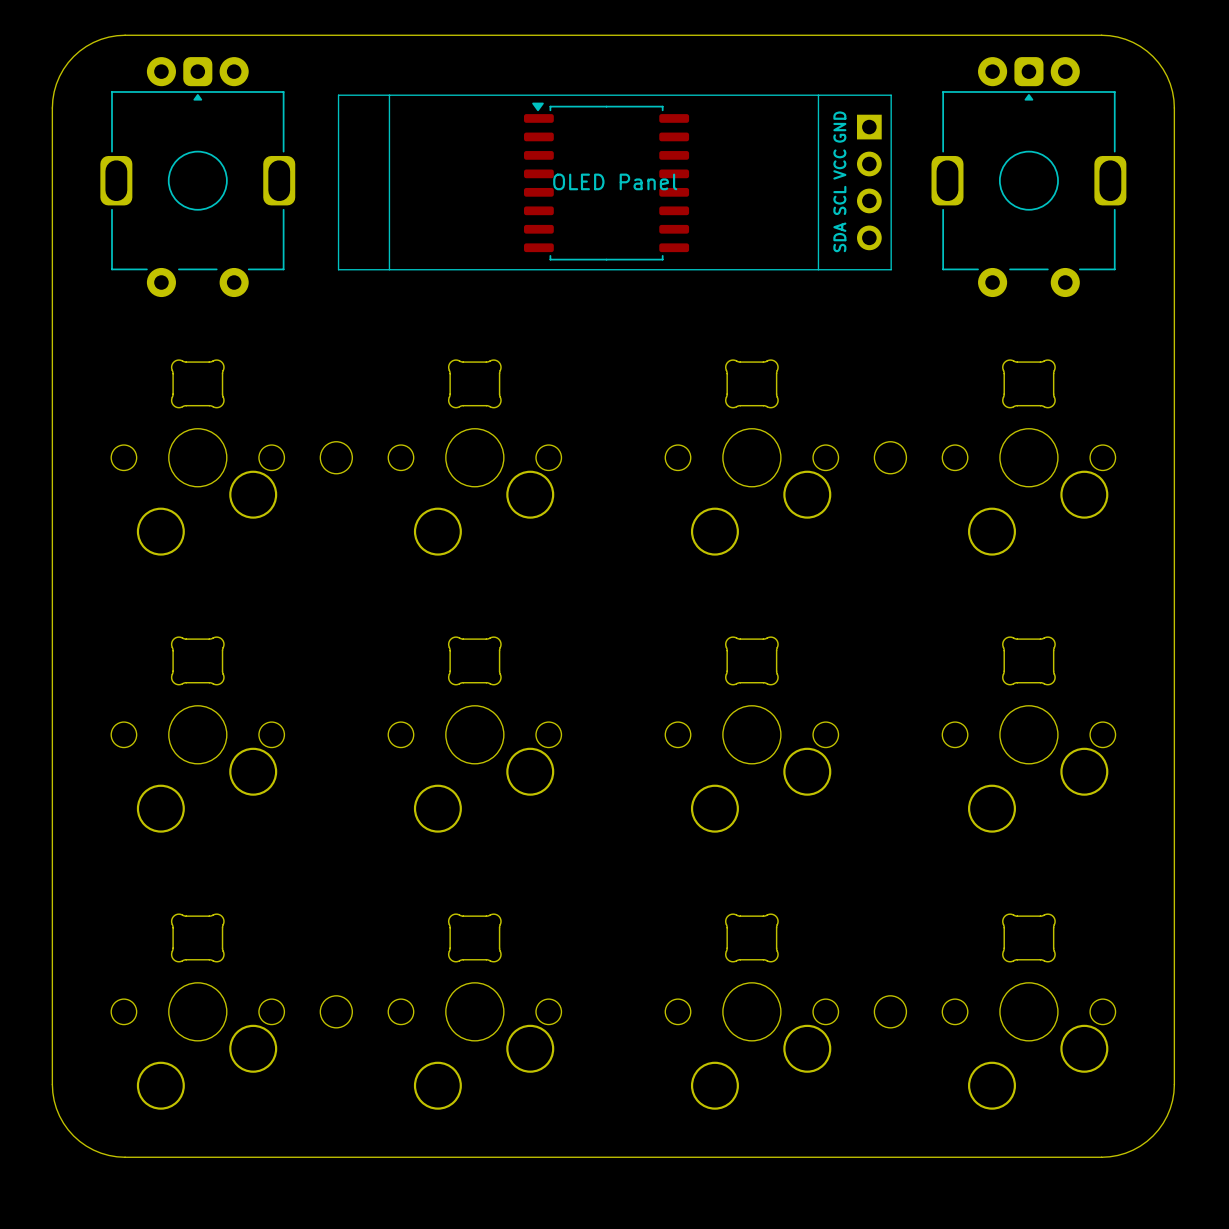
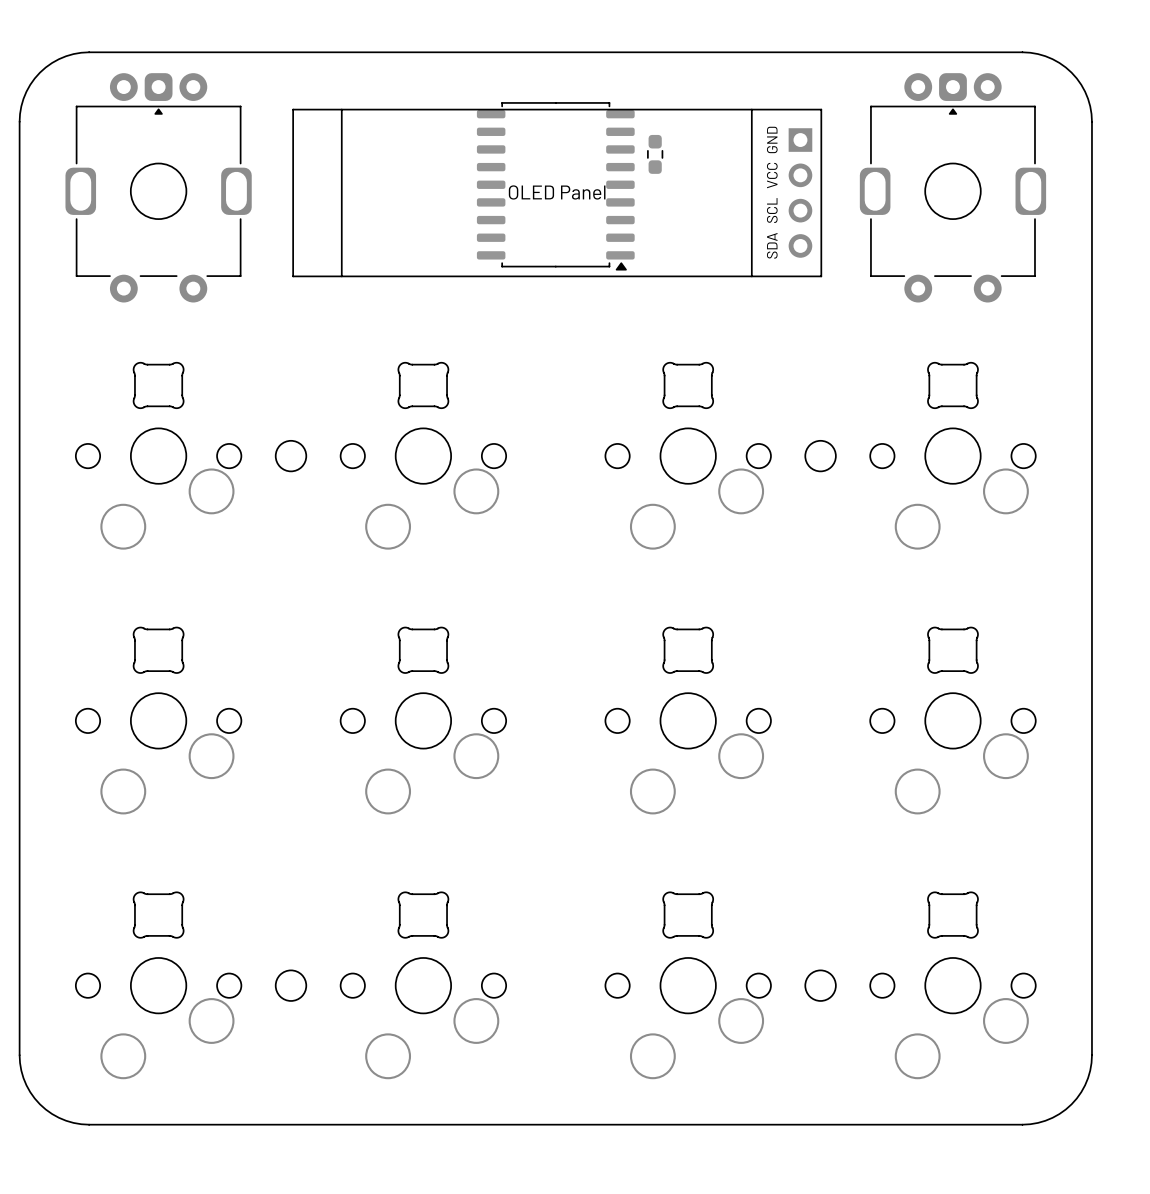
part footprint: [524, 102, 690, 261] -> [476, 102, 635, 271]
part: none -> (655, 154)

